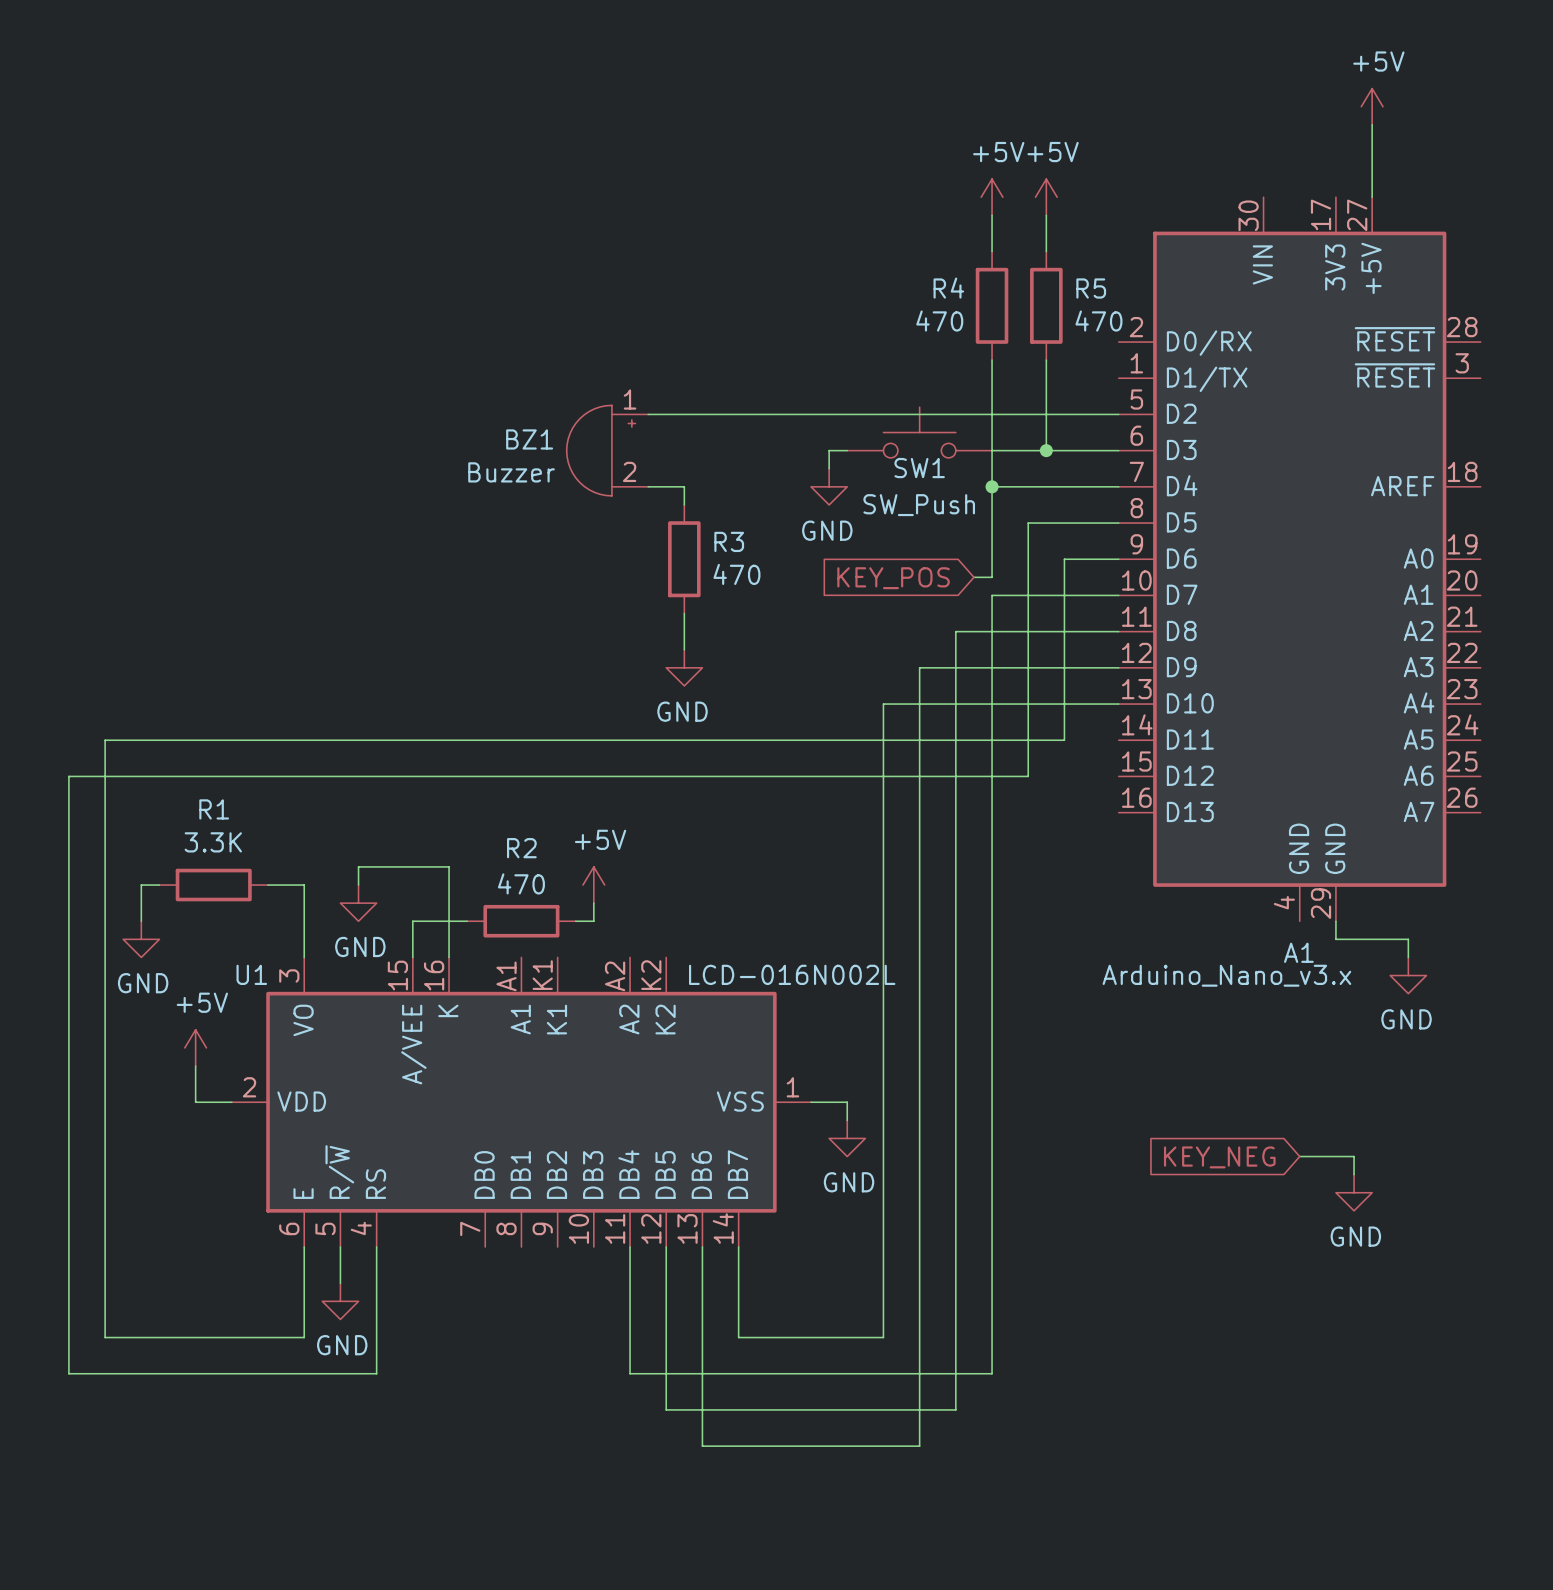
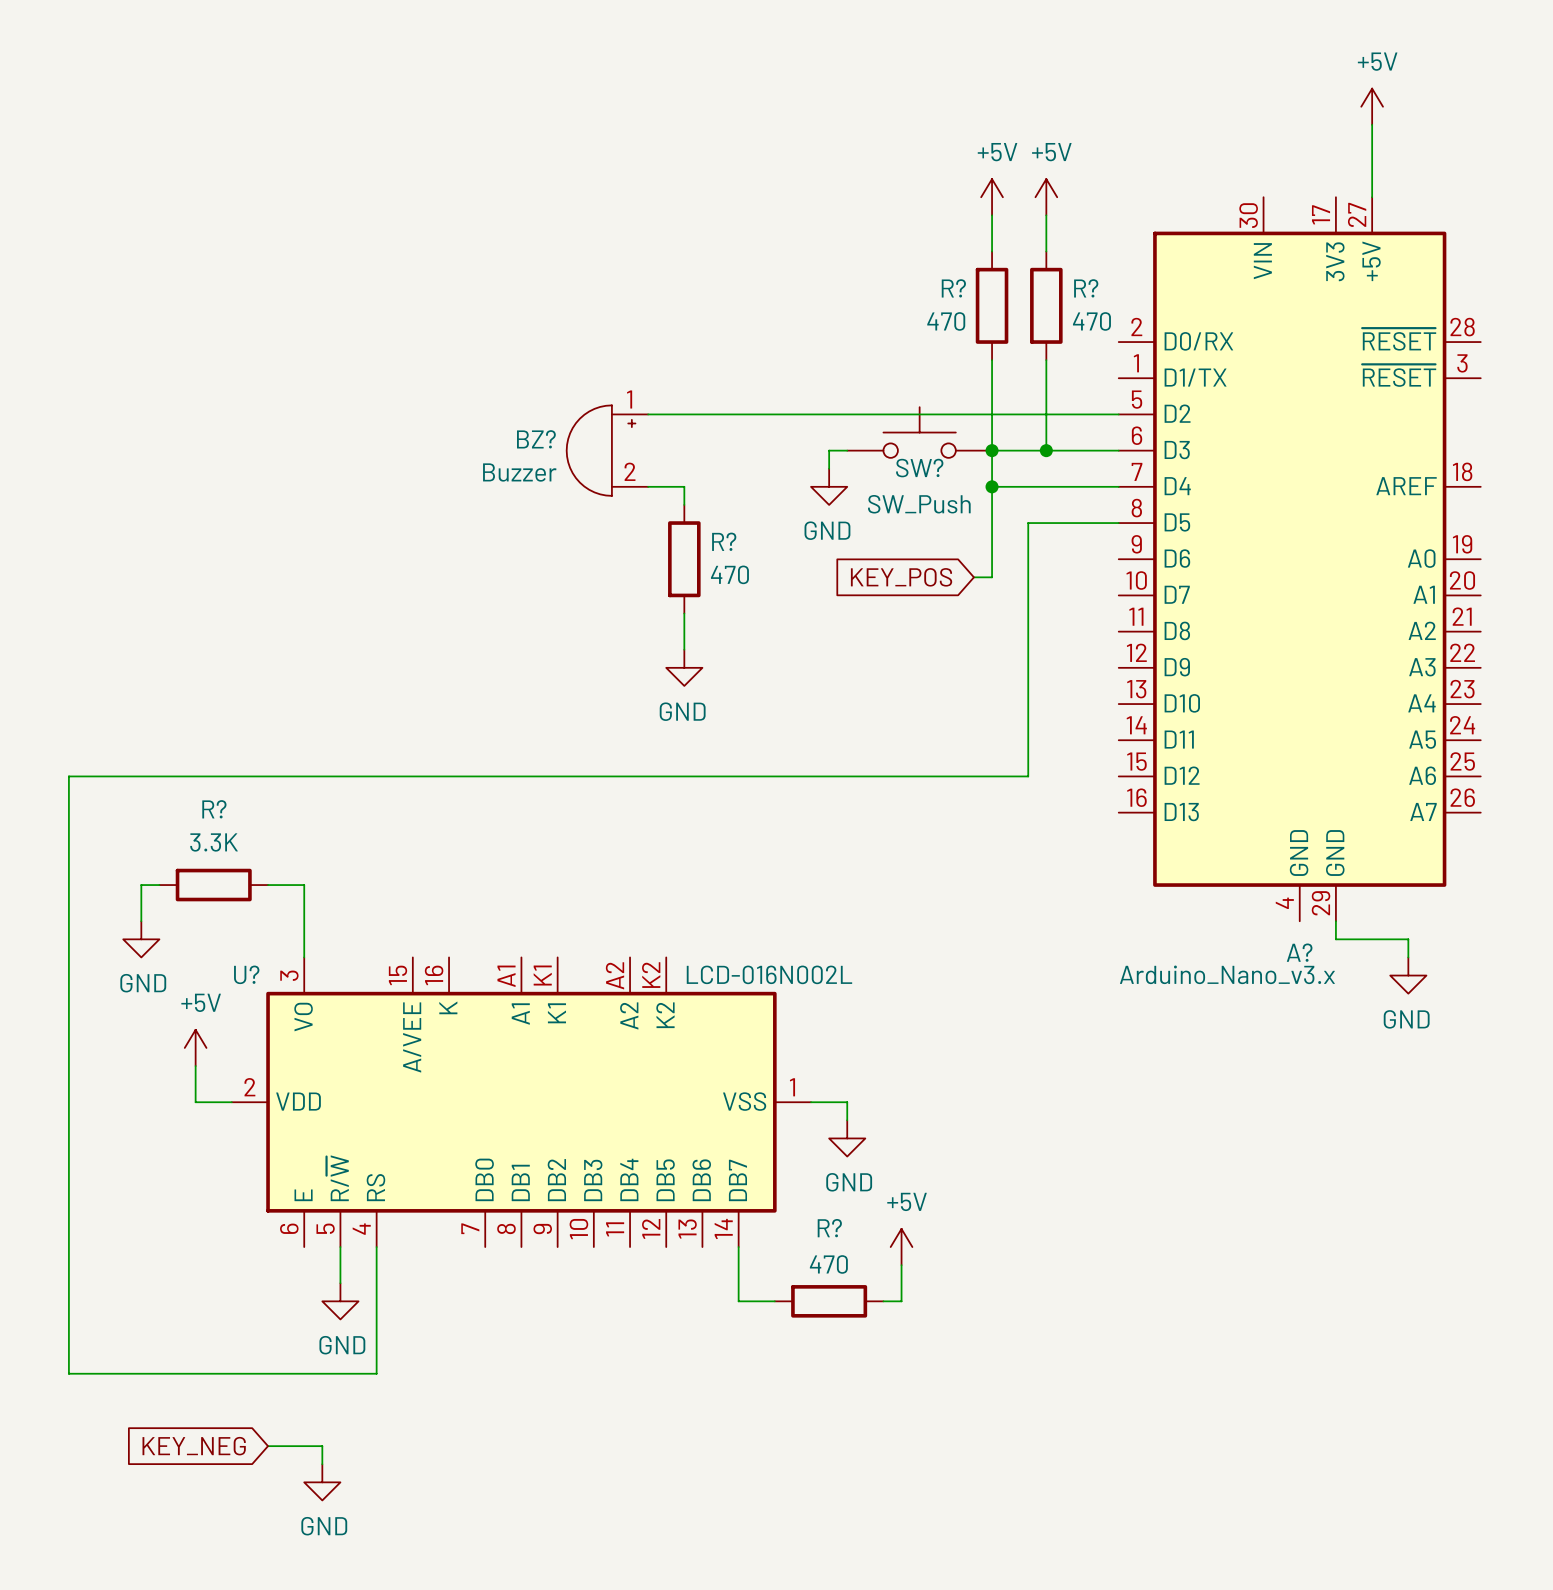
R4 name: R4 (948, 288) -> R? (953, 288)
R5 name: R5 (1091, 288) -> R? (1086, 288)
BZ1 name: BZ1 (529, 439) -> BZ? (536, 439)
junction: none -> (992, 450)
SW1 name: SW1 (919, 468) -> SW? (919, 468)
R3 name: R3 (729, 541) -> R? (724, 541)
wire: (1118, 559) (1064, 559) (1064, 740) (105, 740) (105, 1337) (304, 1337) (304, 1247) -> none
wire: (1118, 595) (992, 595) (992, 1373) (630, 1373) (630, 1247) -> none
wire: (1118, 631) (955, 631) (955, 1409) (666, 1409) (666, 1247) -> none
wire: (1118, 667) (919, 667) (919, 1446) (702, 1446) (702, 1247) -> none
wire: (1118, 704) (883, 704) (883, 1337) (738, 1337) (738, 1301) -> (774, 1301) (738, 1301)
R1 name: R1 (214, 809) -> R? (214, 809)
wire: (358, 885) (358, 866) (449, 866) (449, 957) -> none
power symbol: +5V (593, 885) -> none
power symbol: GND (358, 903) -> none
wire: (593, 903) (593, 921) (575, 921) -> none
wire: (467, 921) (412, 921) (412, 957) -> none
R2: 470 (521, 921) -> none
A1 name: A1 (1298, 952) -> A? (1299, 952)
U1 name: U1 (251, 974) -> U? (246, 974)
wire: (1299, 1156) (1354, 1156) (1354, 1174) -> none
global label: KEY_NEG (1219, 1157) -> none
power symbol: GND (1354, 1192) -> none
power symbol: none -> +5V (901, 1247)
wire: none -> (901, 1265) (901, 1301) (883, 1301)
R?: none -> 470 (829, 1301)
wire: none -> (268, 1446) (322, 1446) (322, 1464)
global label: none -> KEY_NEG (194, 1446)
power symbol: none -> GND (322, 1482)

